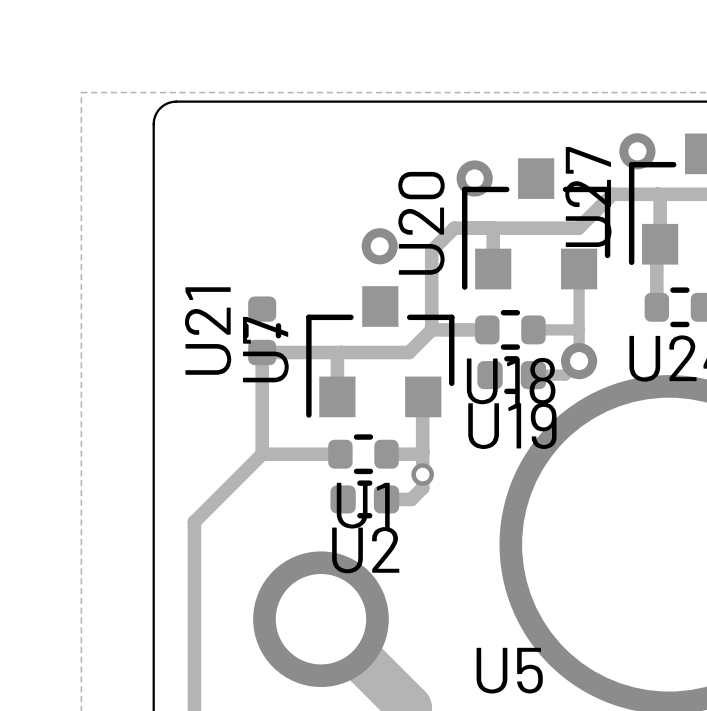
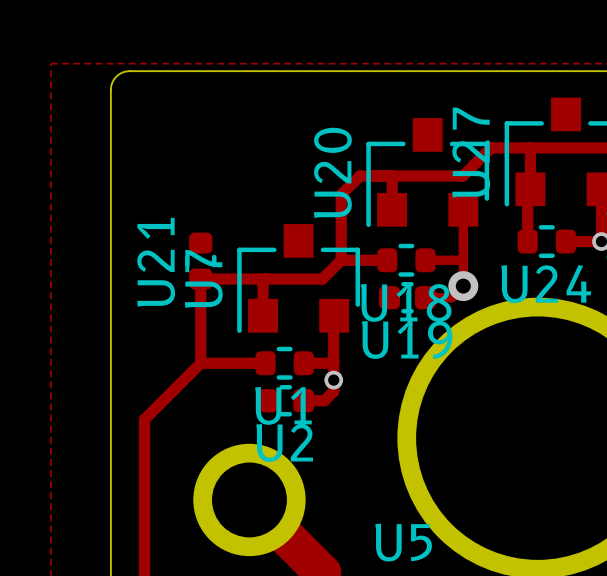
via: (637, 151) -> none
via: (474, 178) -> none
via: (379, 246) -> none

